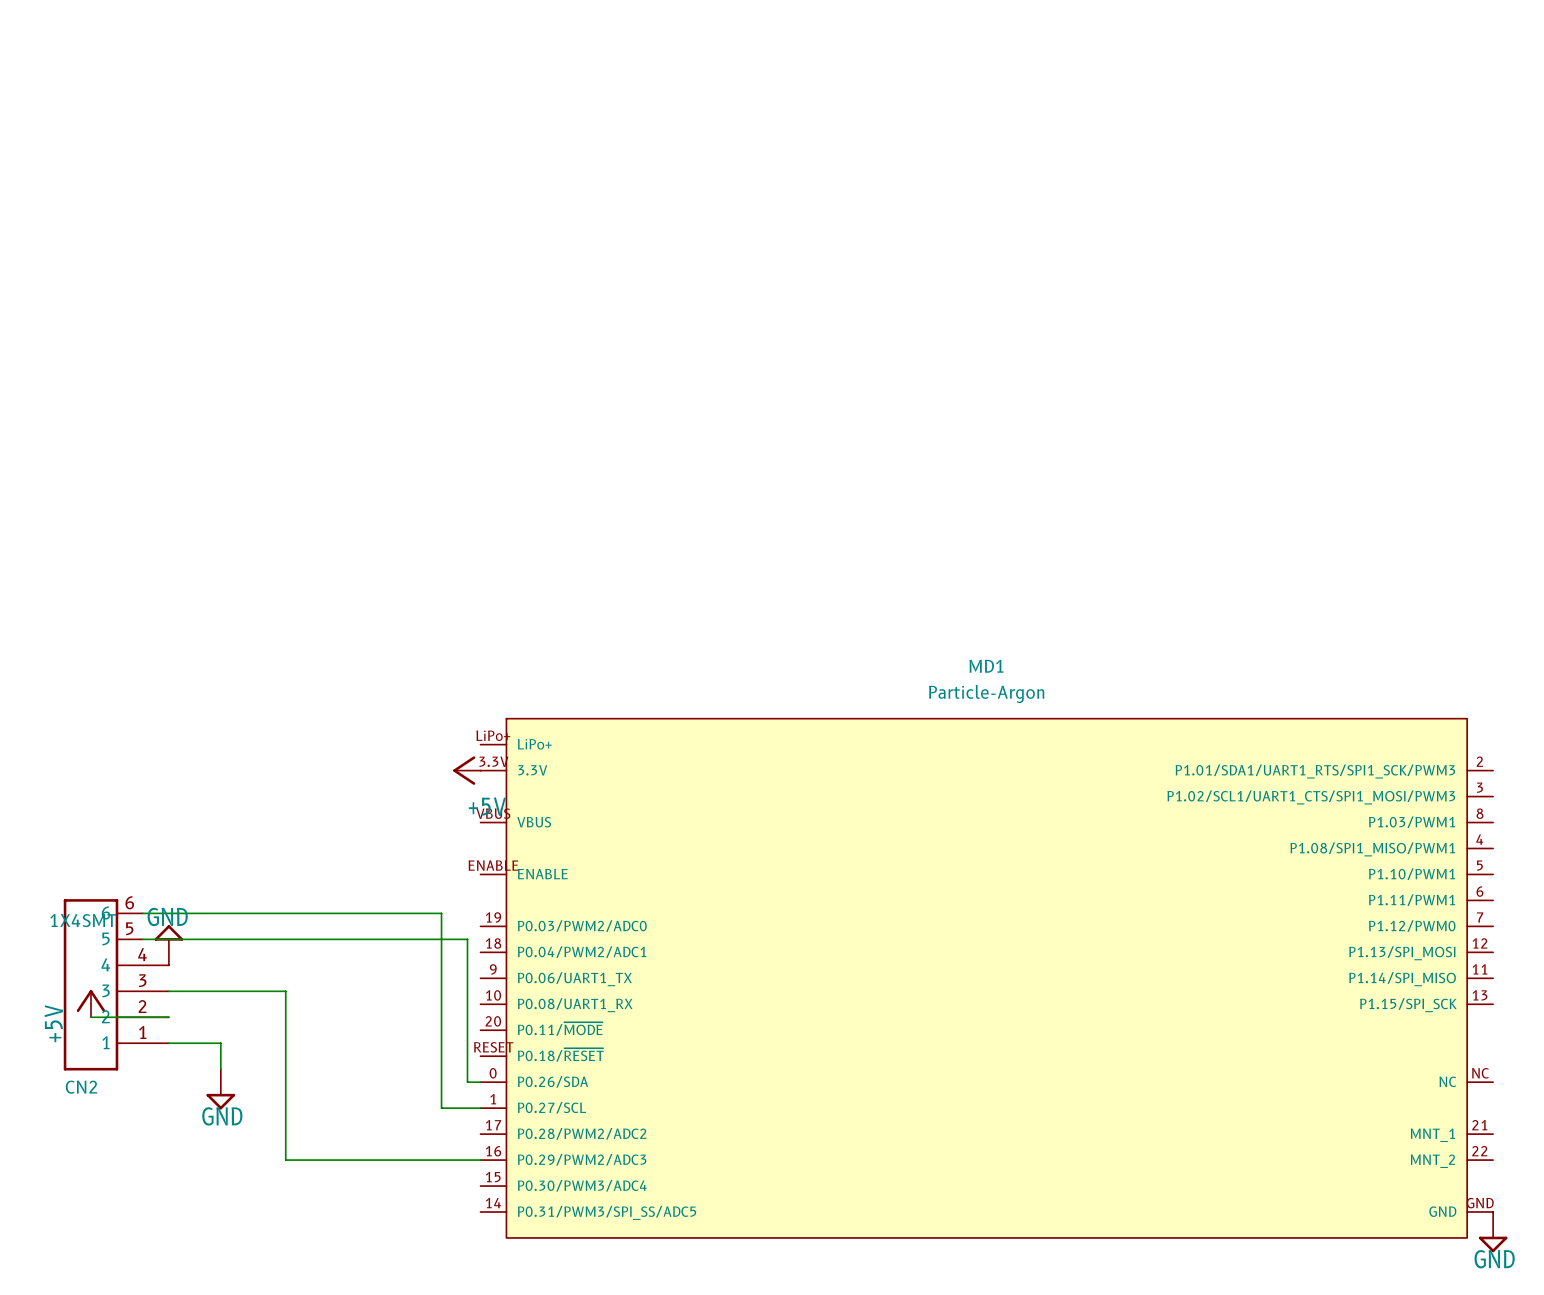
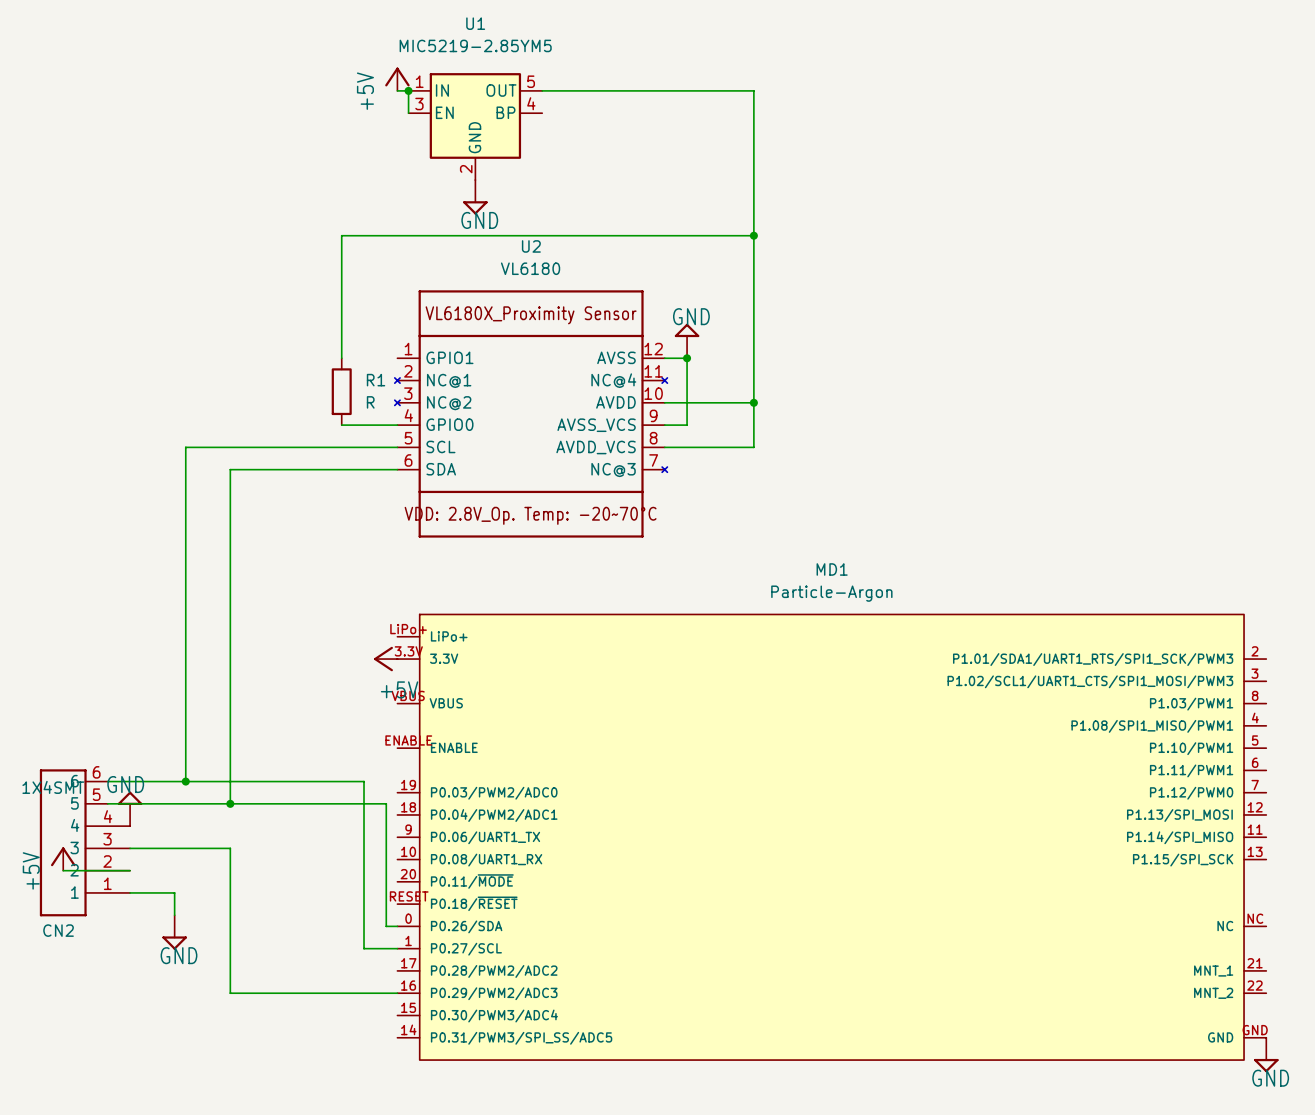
power symbol: none -> +5V (397, 79)
wire: none -> (397, 90) (408, 90) (408, 113)
junction: none -> (408, 90)
wire: none -> (542, 90) (753, 90) (753, 447) (664, 447)
U1: none -> MIC5219-2.85YM5 (475, 126)
power symbol: none -> GND (475, 197)
wire: none -> (753, 235) (341, 235) (341, 358)
junction: none -> (753, 235)
power symbol: none -> GND (687, 341)
wire: none -> (664, 358) (687, 358) (687, 425) (664, 425)
junction: none -> (687, 358)
R1: none -> R (341, 391)
wire: none -> (664, 402) (753, 402)
junction: none -> (753, 402)
U2: none -> VL6180 (531, 413)
wire: none -> (341, 425) (397, 425)
wire: none -> (397, 447) (185, 447) (185, 781)
wire: none -> (397, 469) (230, 469) (230, 803)
junction: none -> (185, 781)
junction: none -> (230, 803)

